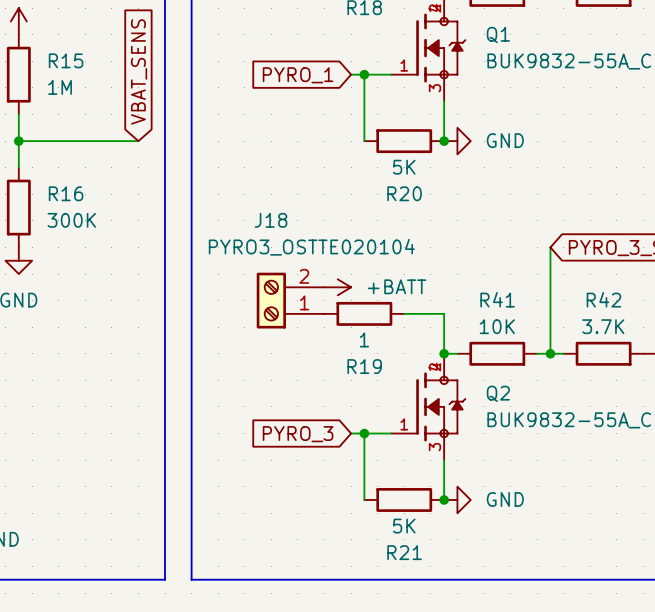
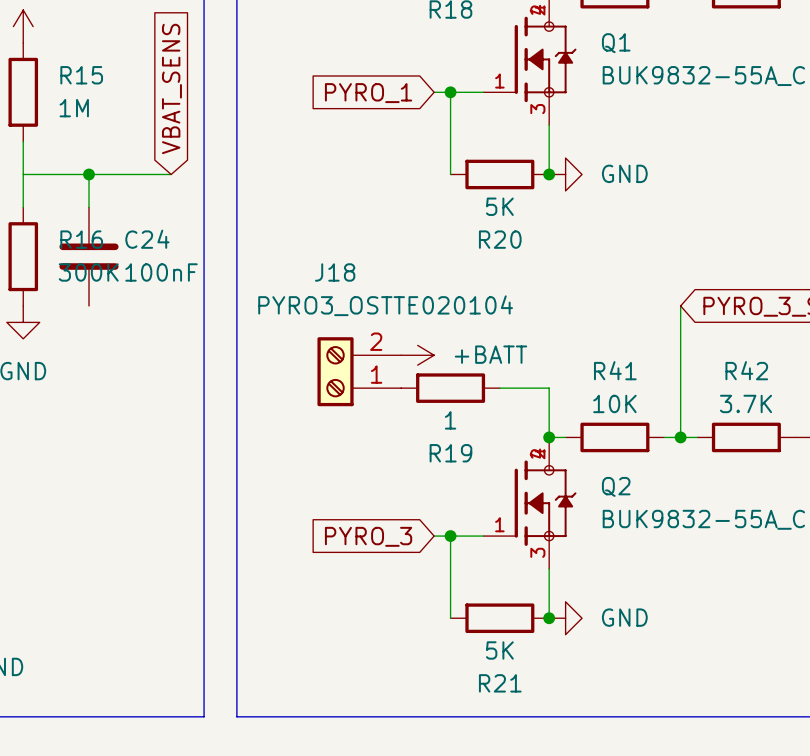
junction: (18, 141) -> none
wire: none -> (89, 174) (89, 207)
junction: none -> (89, 174)
C24: none -> 100nF (89, 256)

